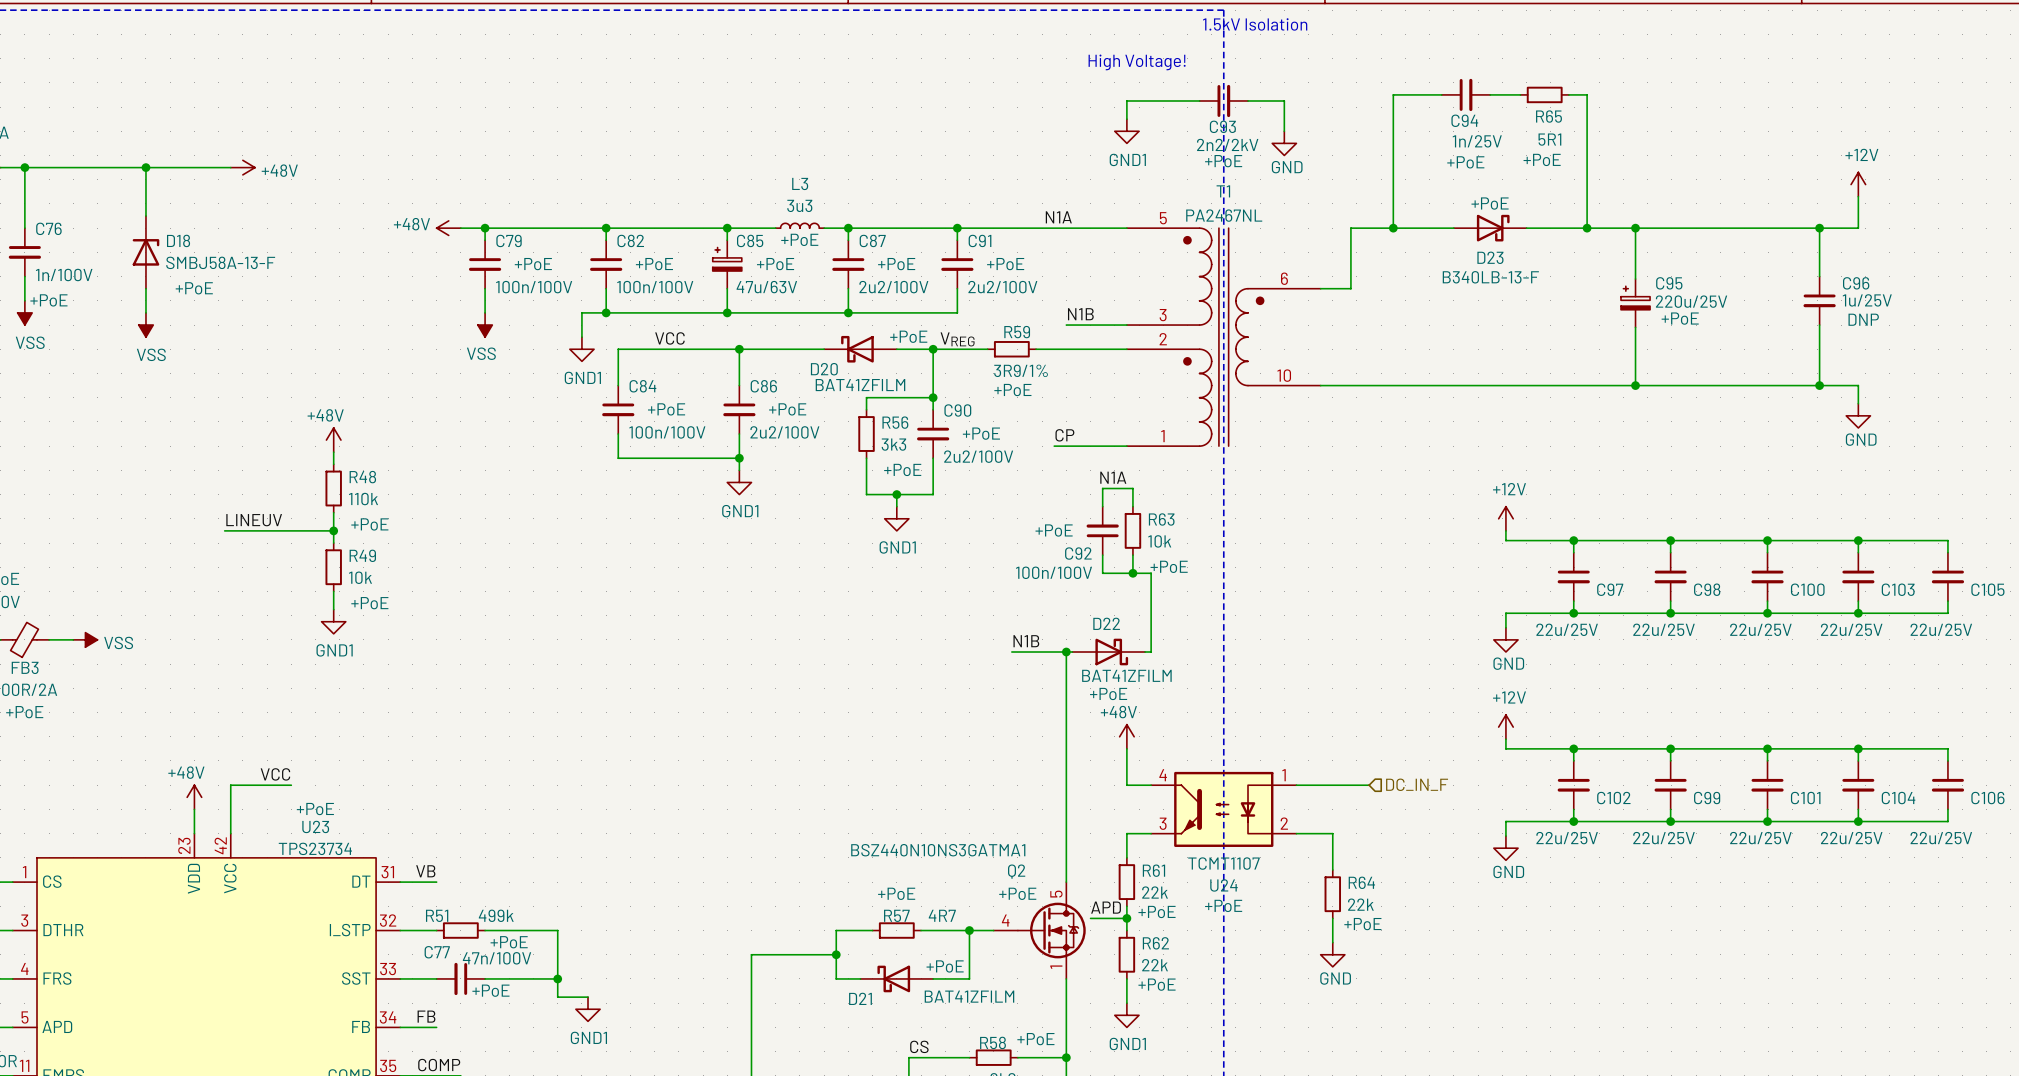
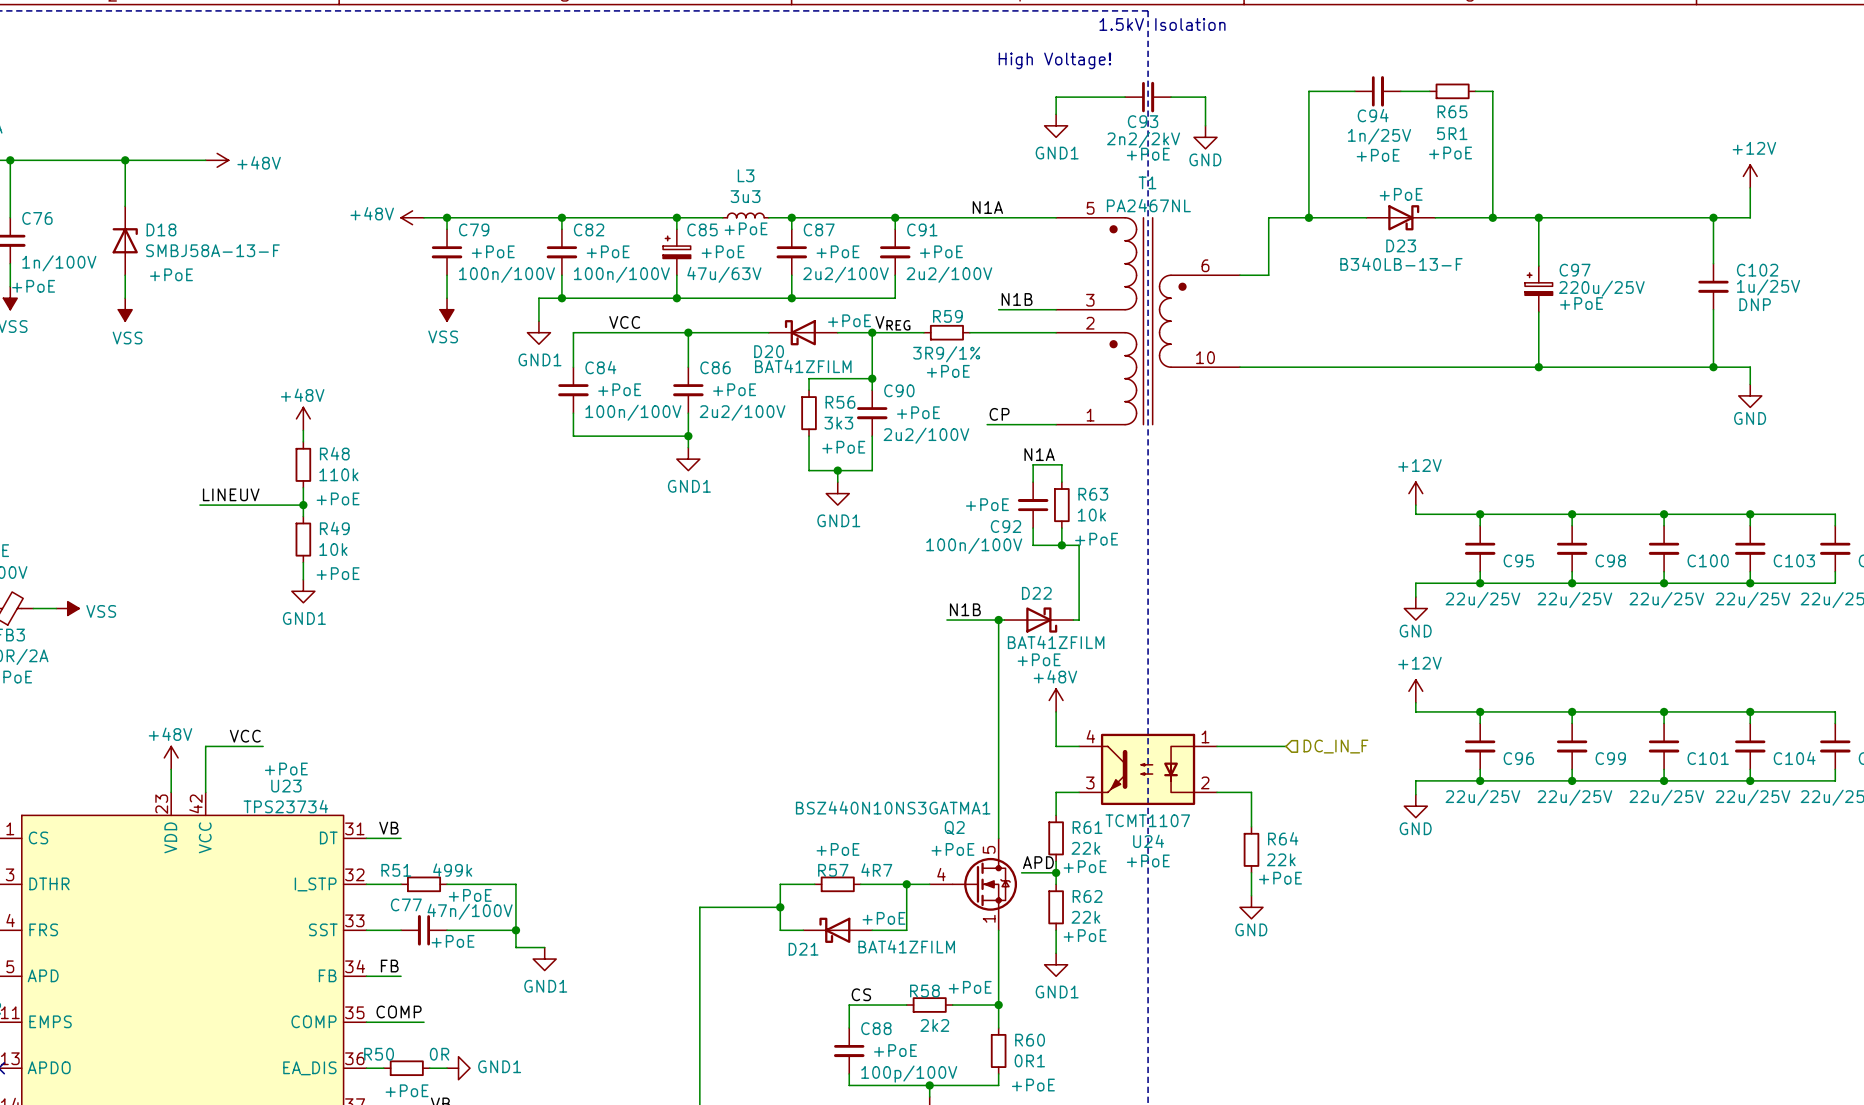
C95 name: C95 (1669, 283) -> C97 (1575, 270)
C96 name: C96 (1856, 283) -> C102 (1757, 270)
C97 name: C97 (1610, 589) -> C95 (1518, 560)
C102 name: C102 (1613, 798) -> C96 (1518, 758)

